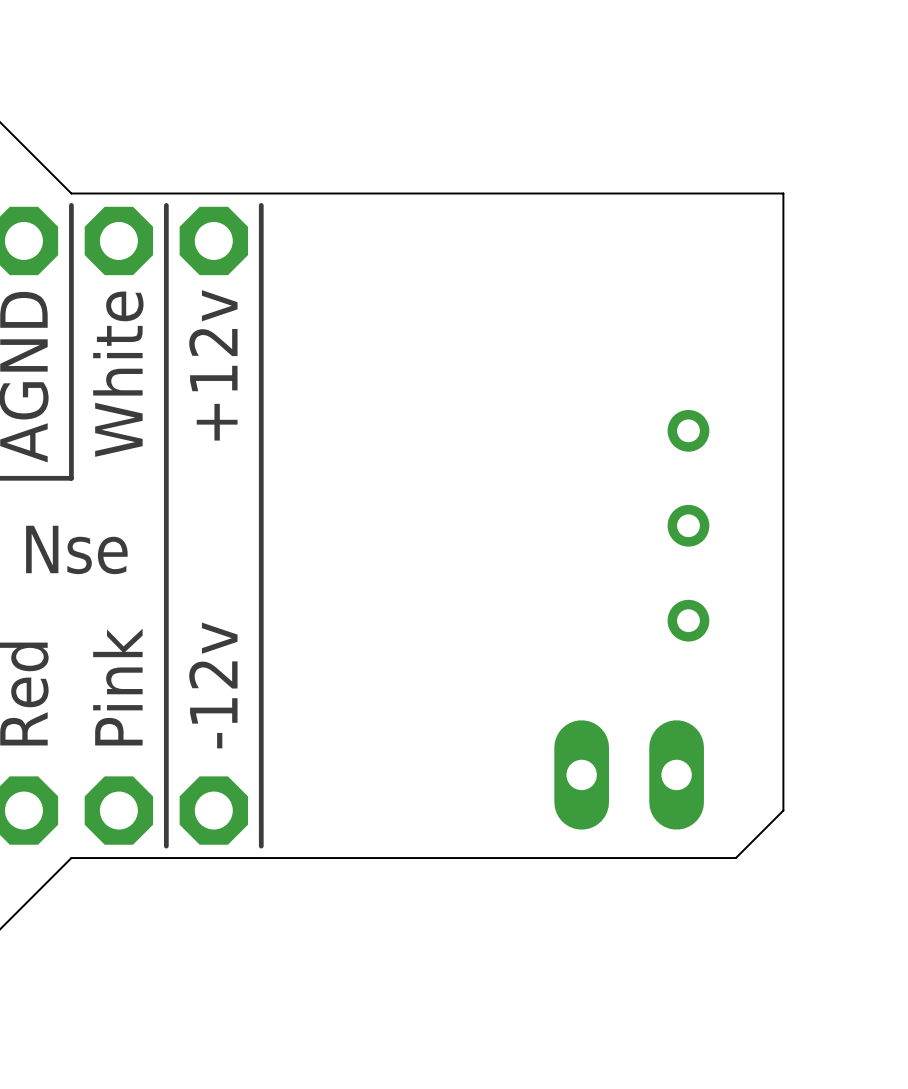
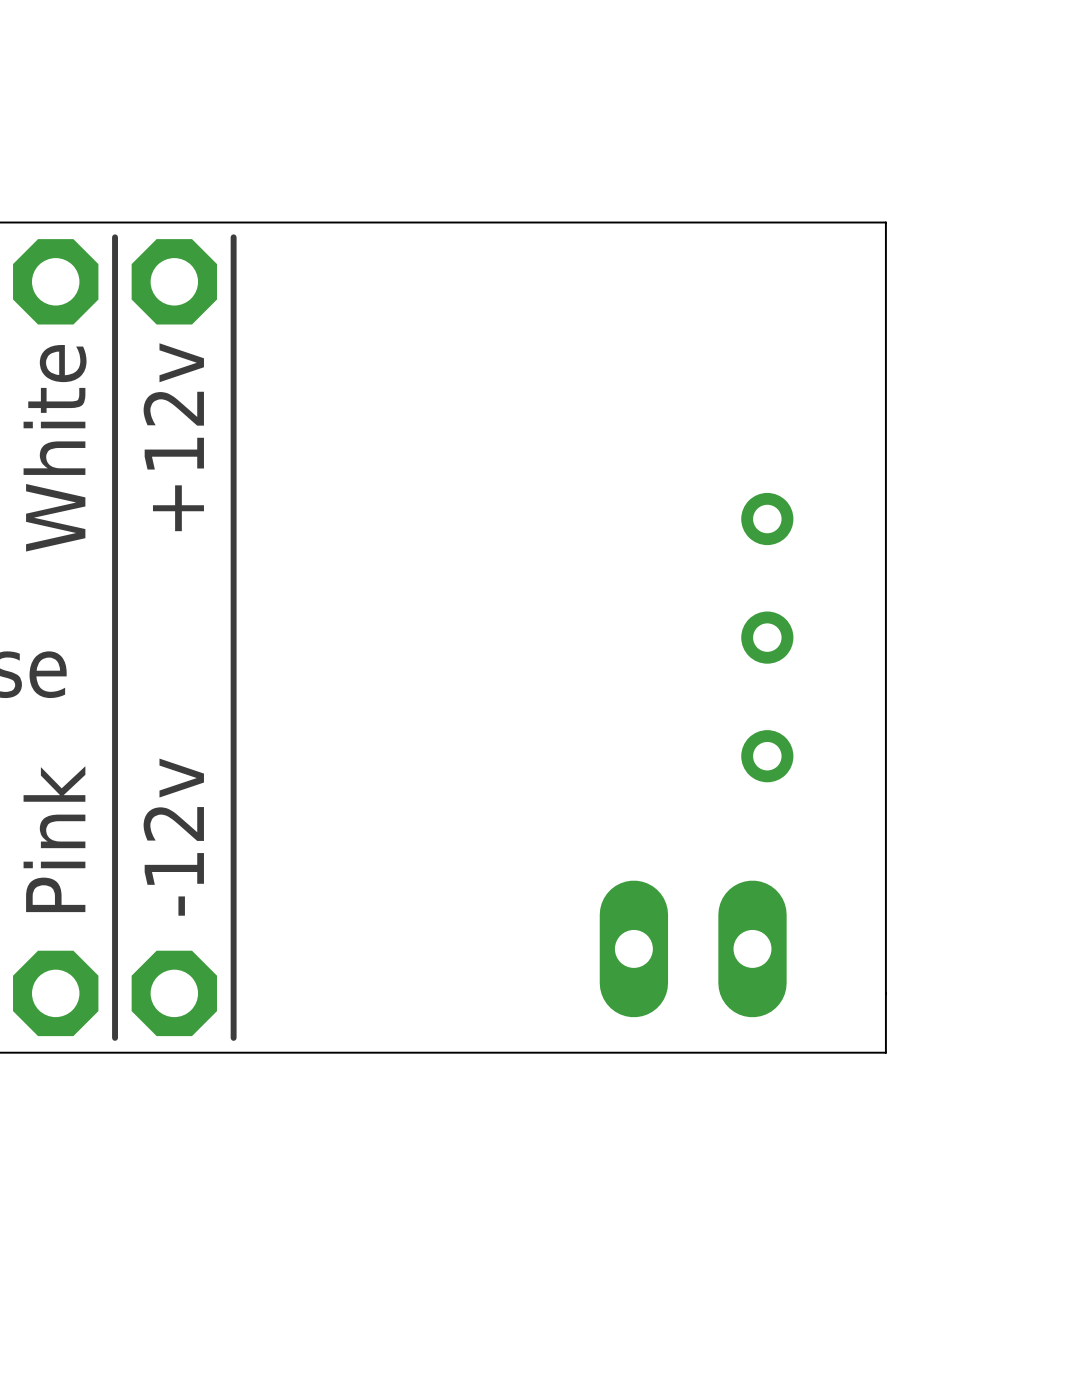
board edge: (783, 810) (735, 858) -> (885, 993) (885, 1052) (826, 1052)

